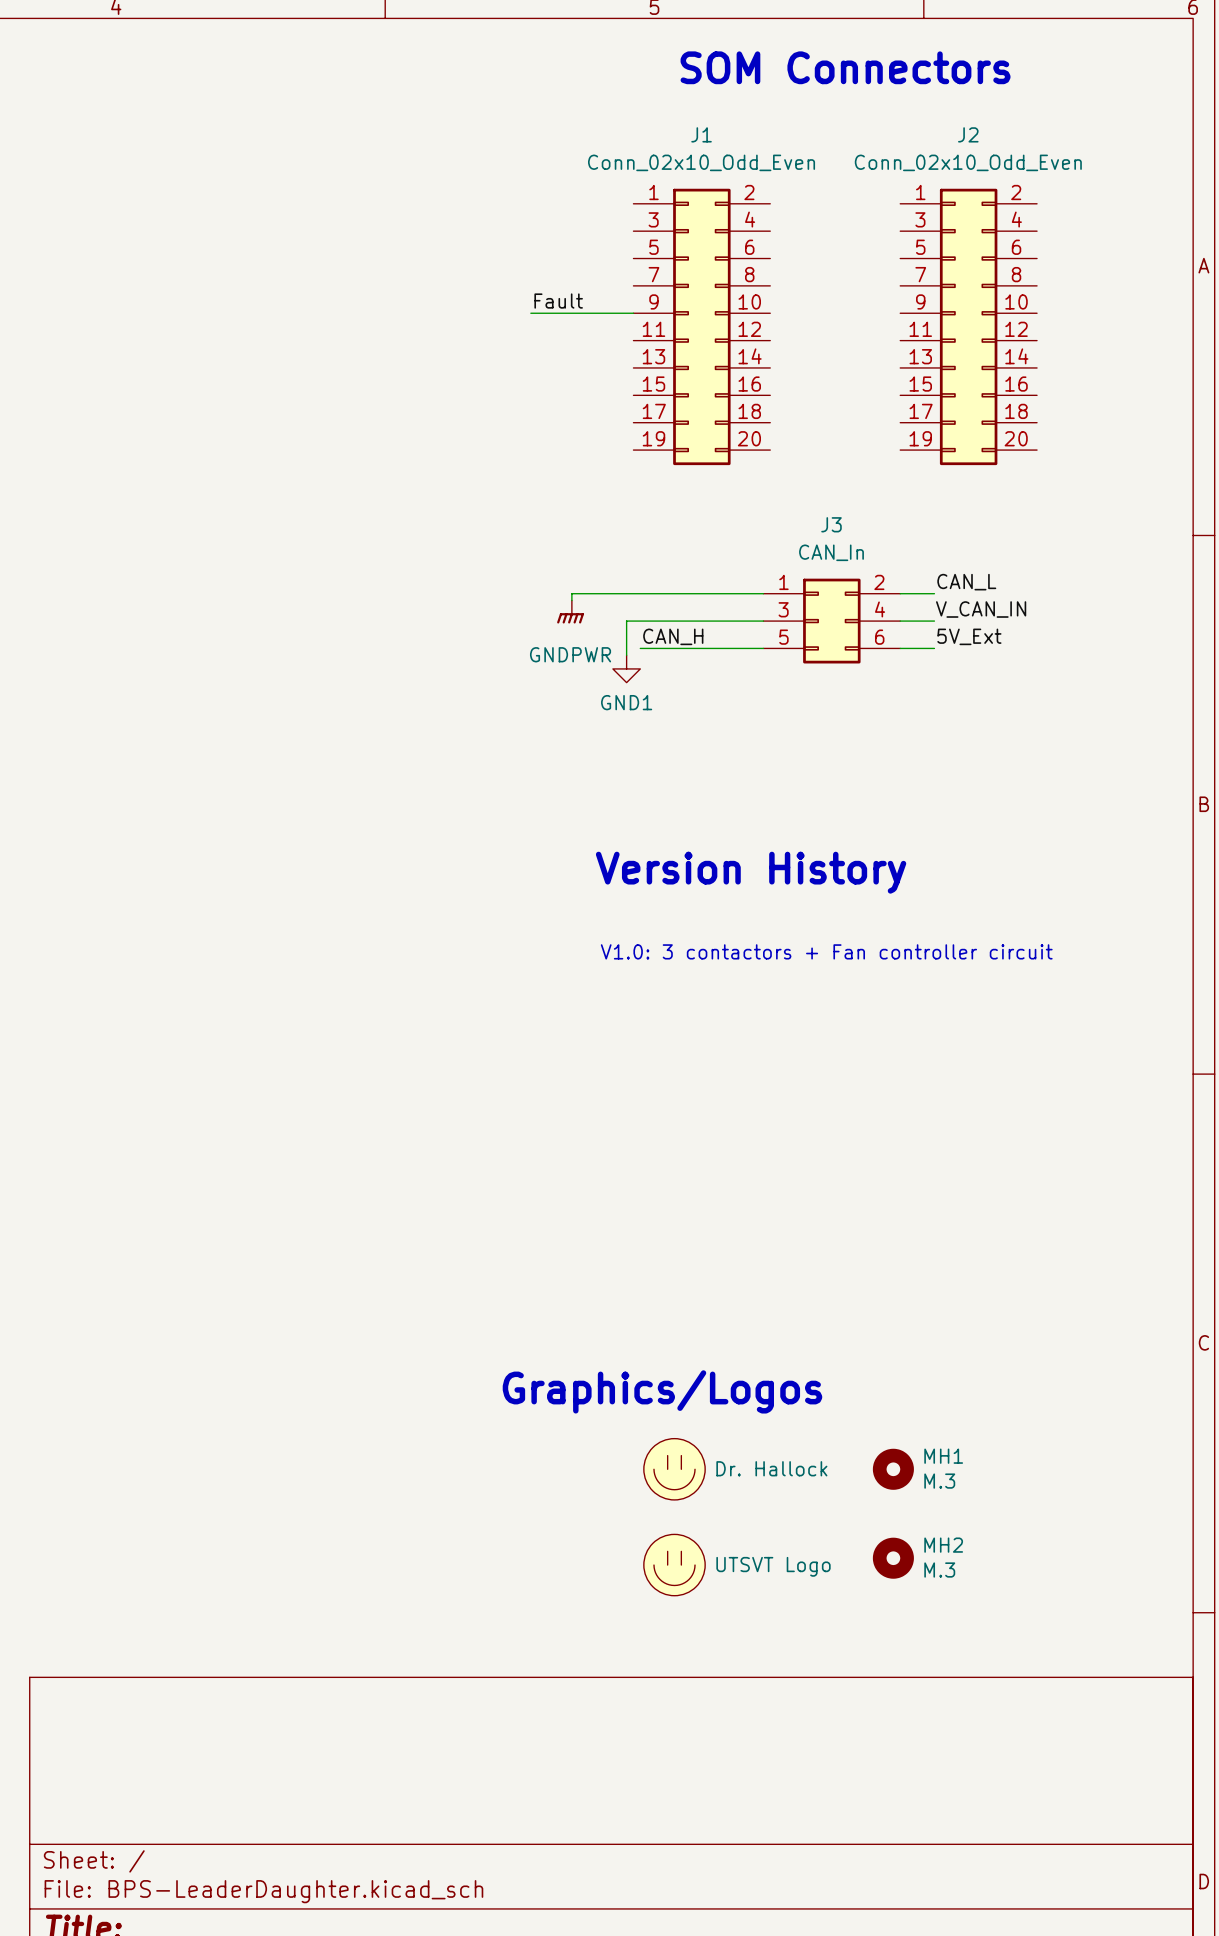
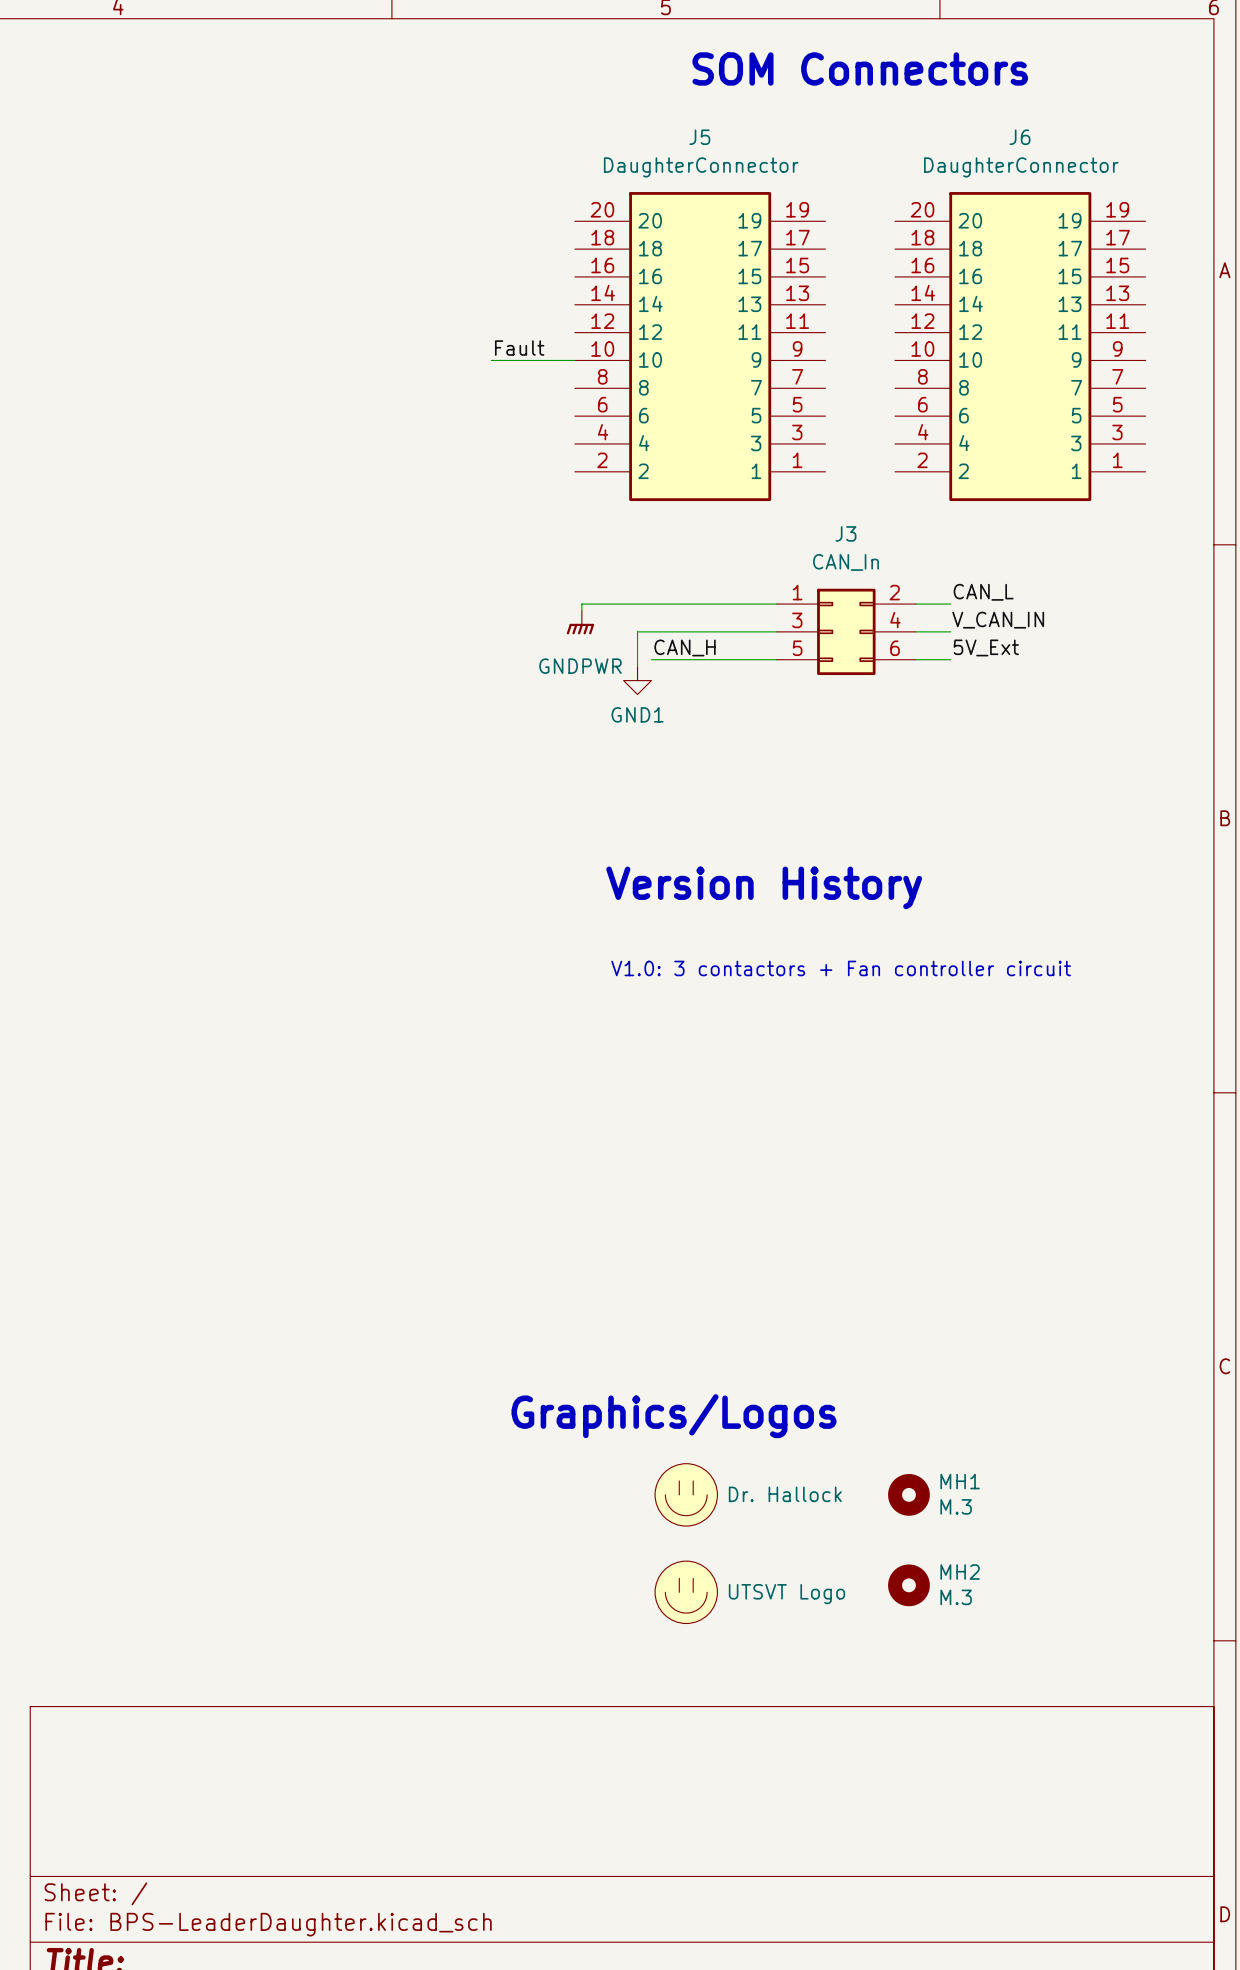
label position: Fault (558, 301) -> Fault (519, 348)
wire: (530, 313) (633, 313) -> none
J1: Conn_02x10_Odd_Even (701, 326) -> none
J2: Conn_02x10_Odd_Even (968, 326) -> none
J5: none -> DaughterConnector (700, 346)
J6: none -> DaughterConnector (1020, 346)
wire: none -> (491, 360) (574, 360)

